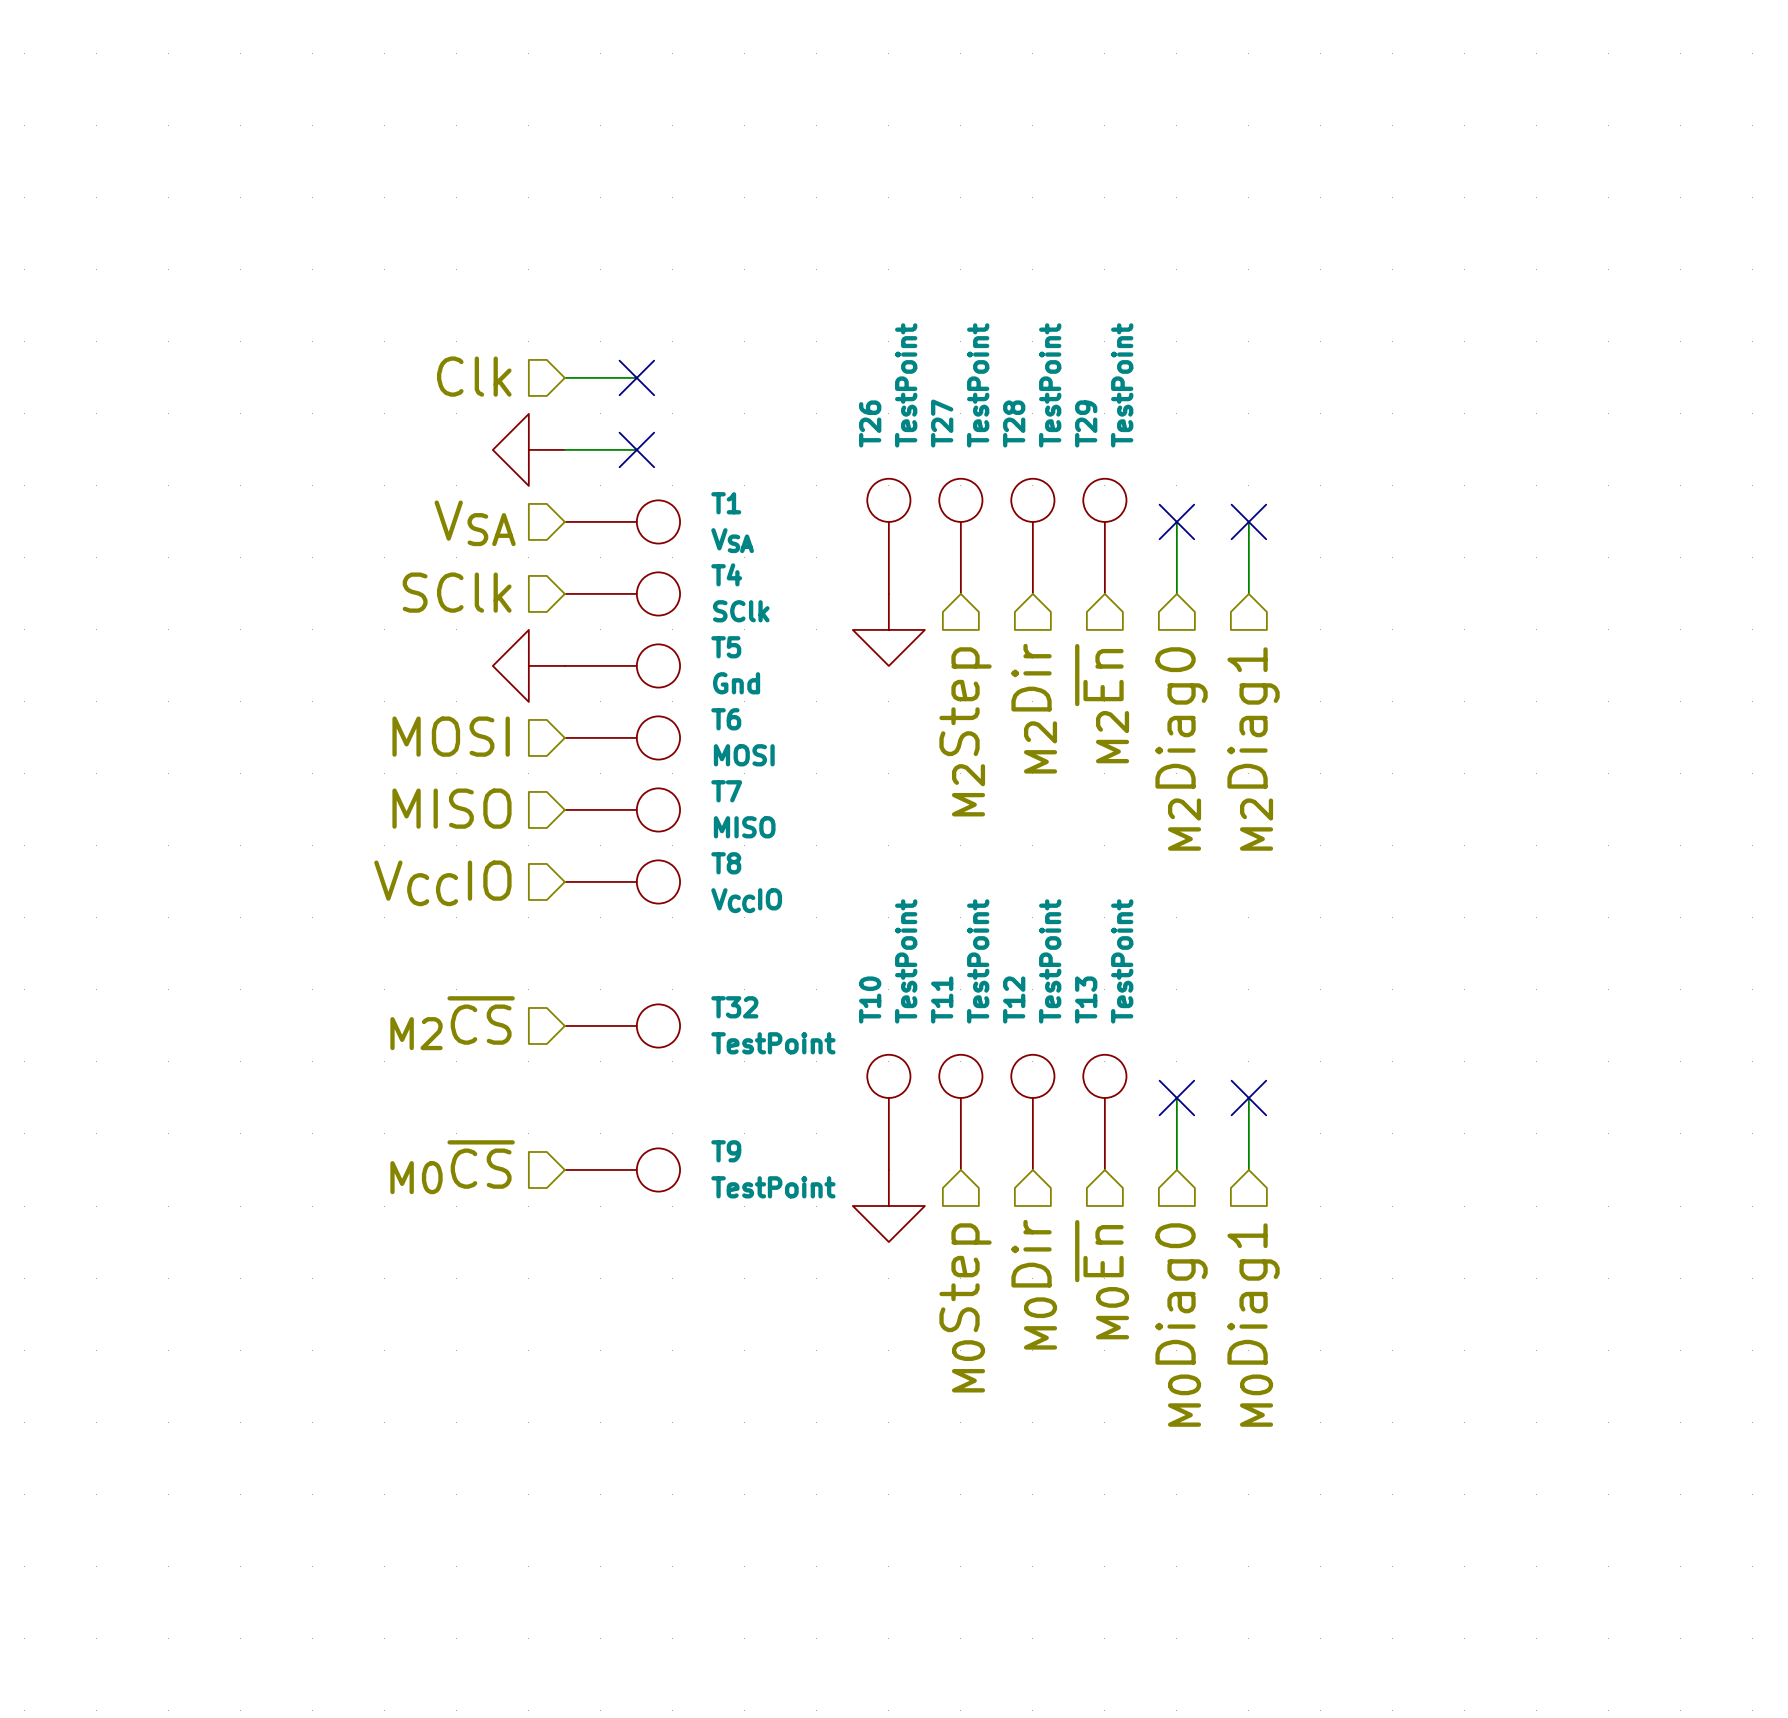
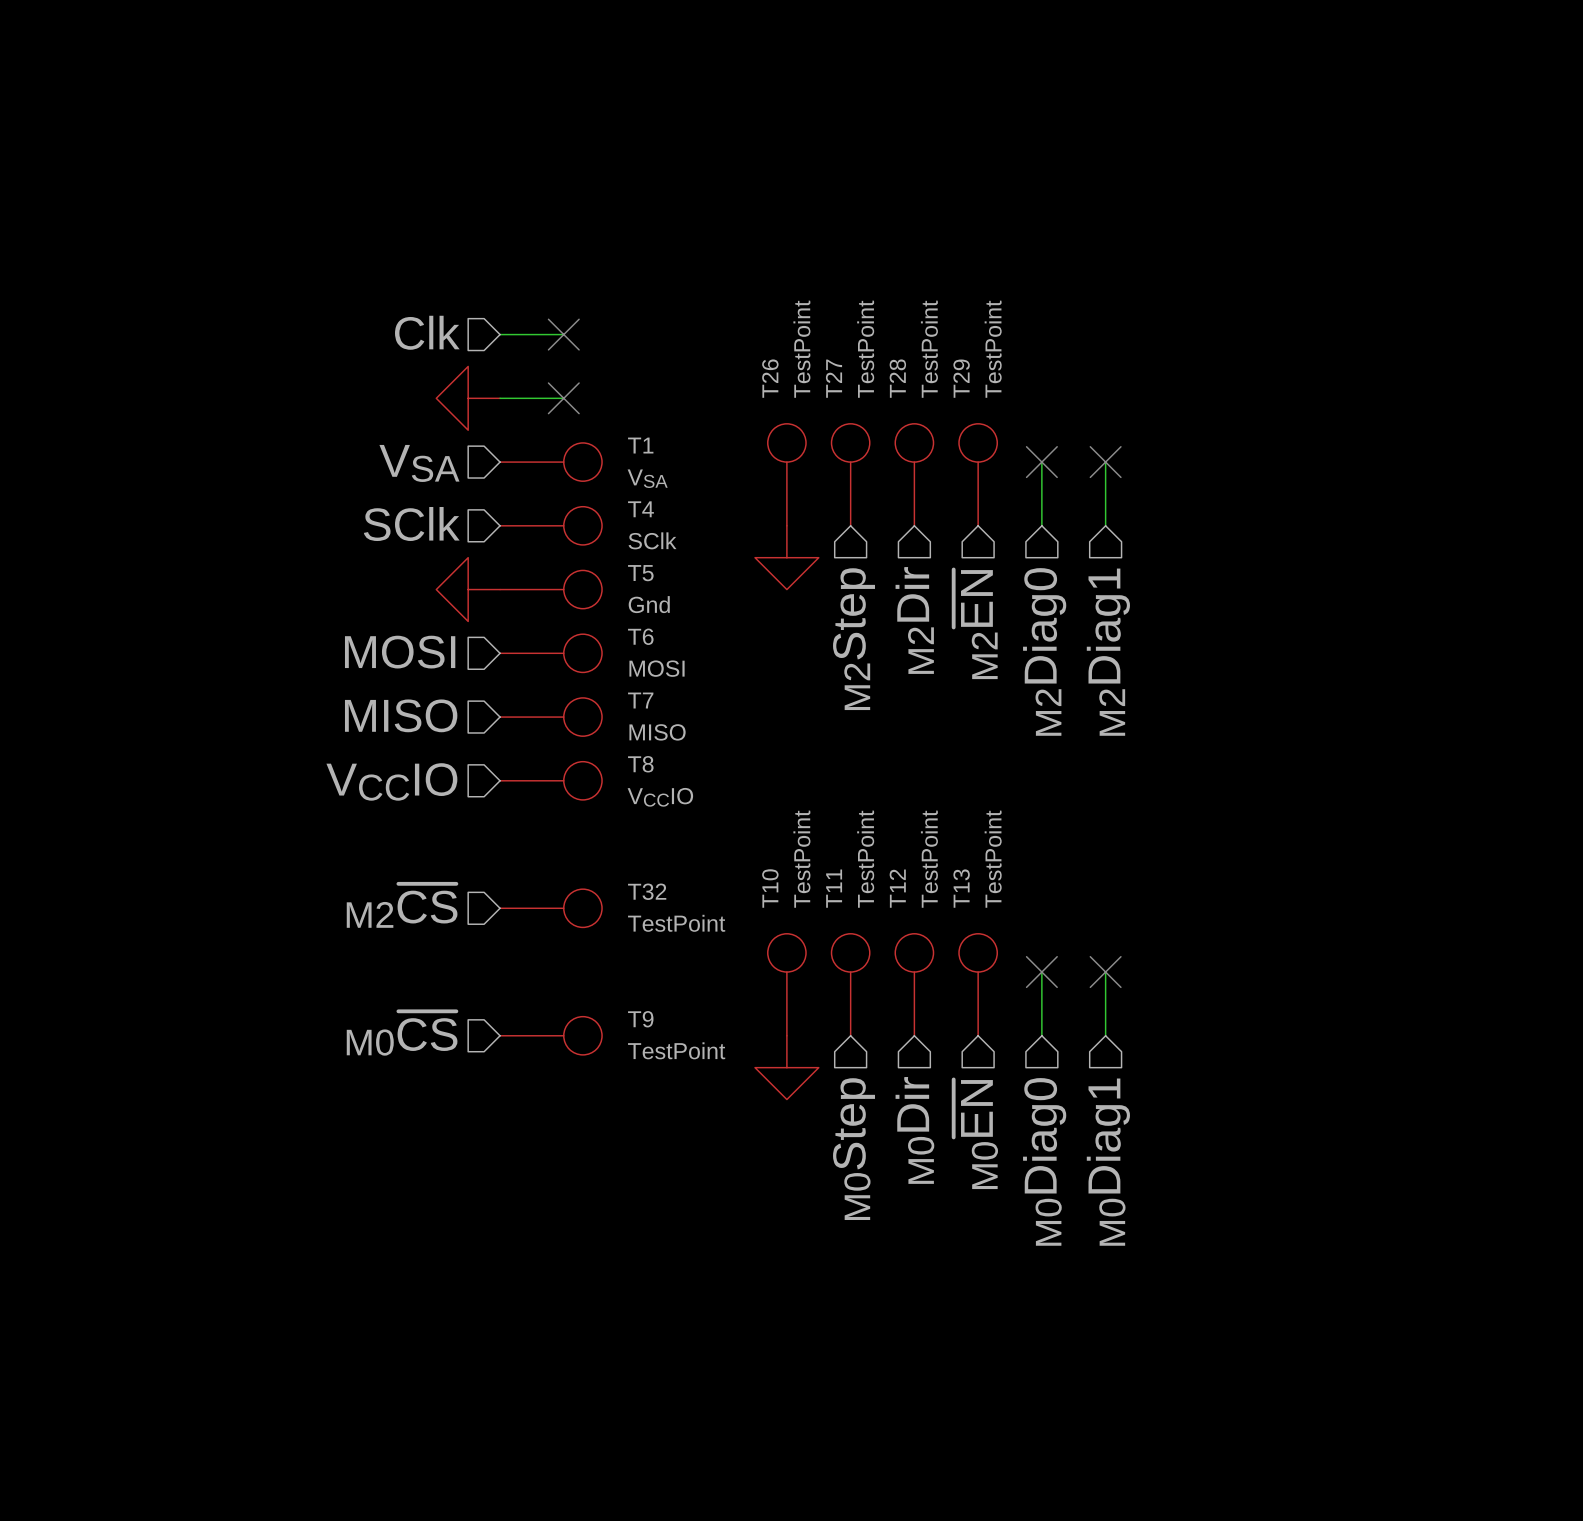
hierarchical label: M2~{En} (1102, 703) -> M2~{EN} (975, 624)
hierarchical label: M0~{En} (1102, 1279) -> M0~{EN} (975, 1134)

